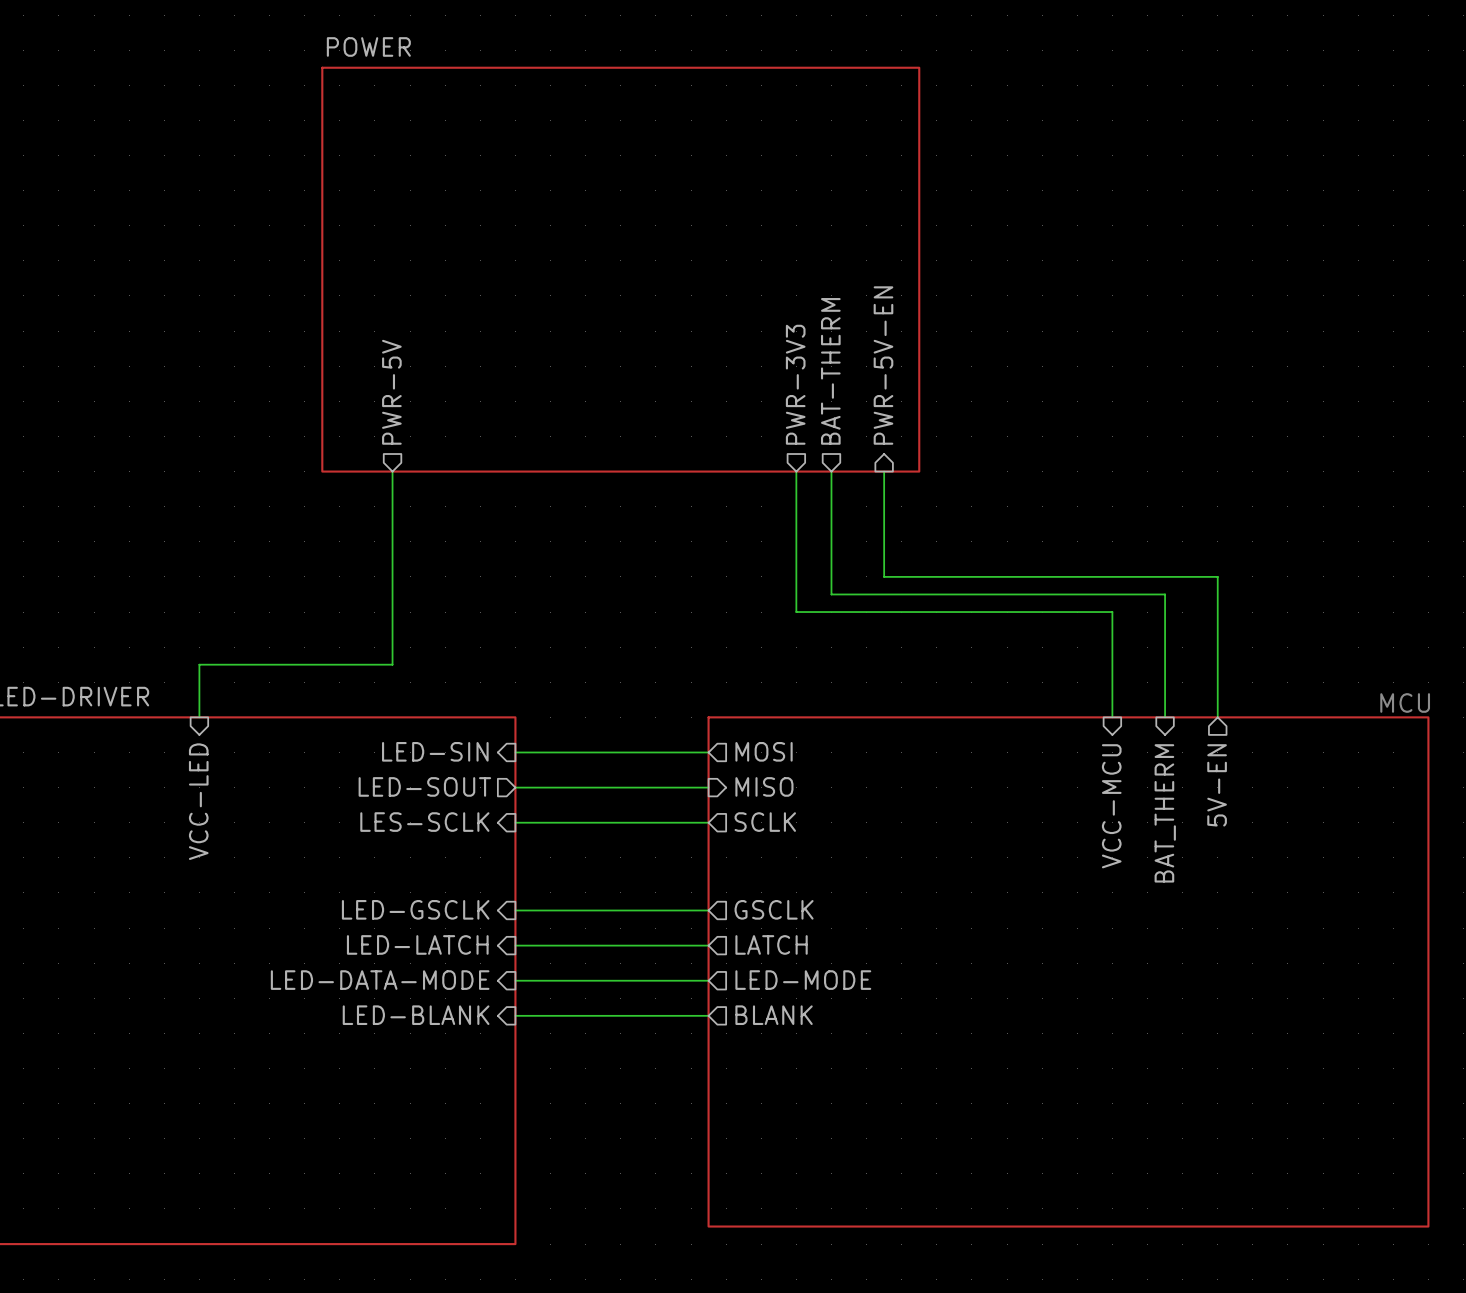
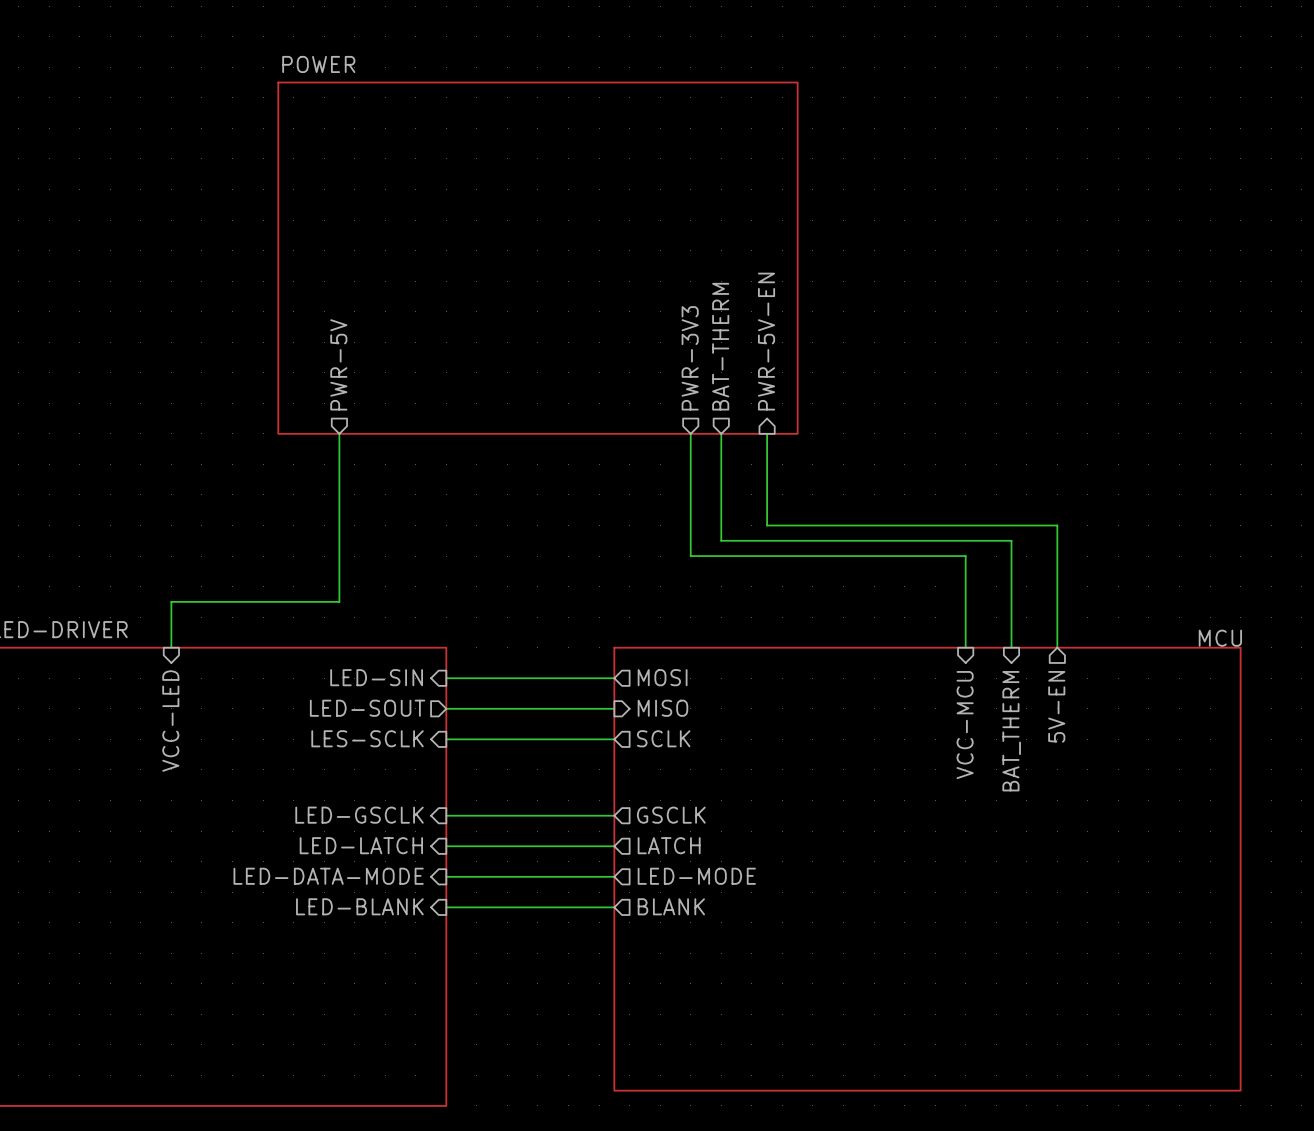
text: MCU (1405, 702) -> none
sheet MCU name: none -> MCU (1220, 638)

